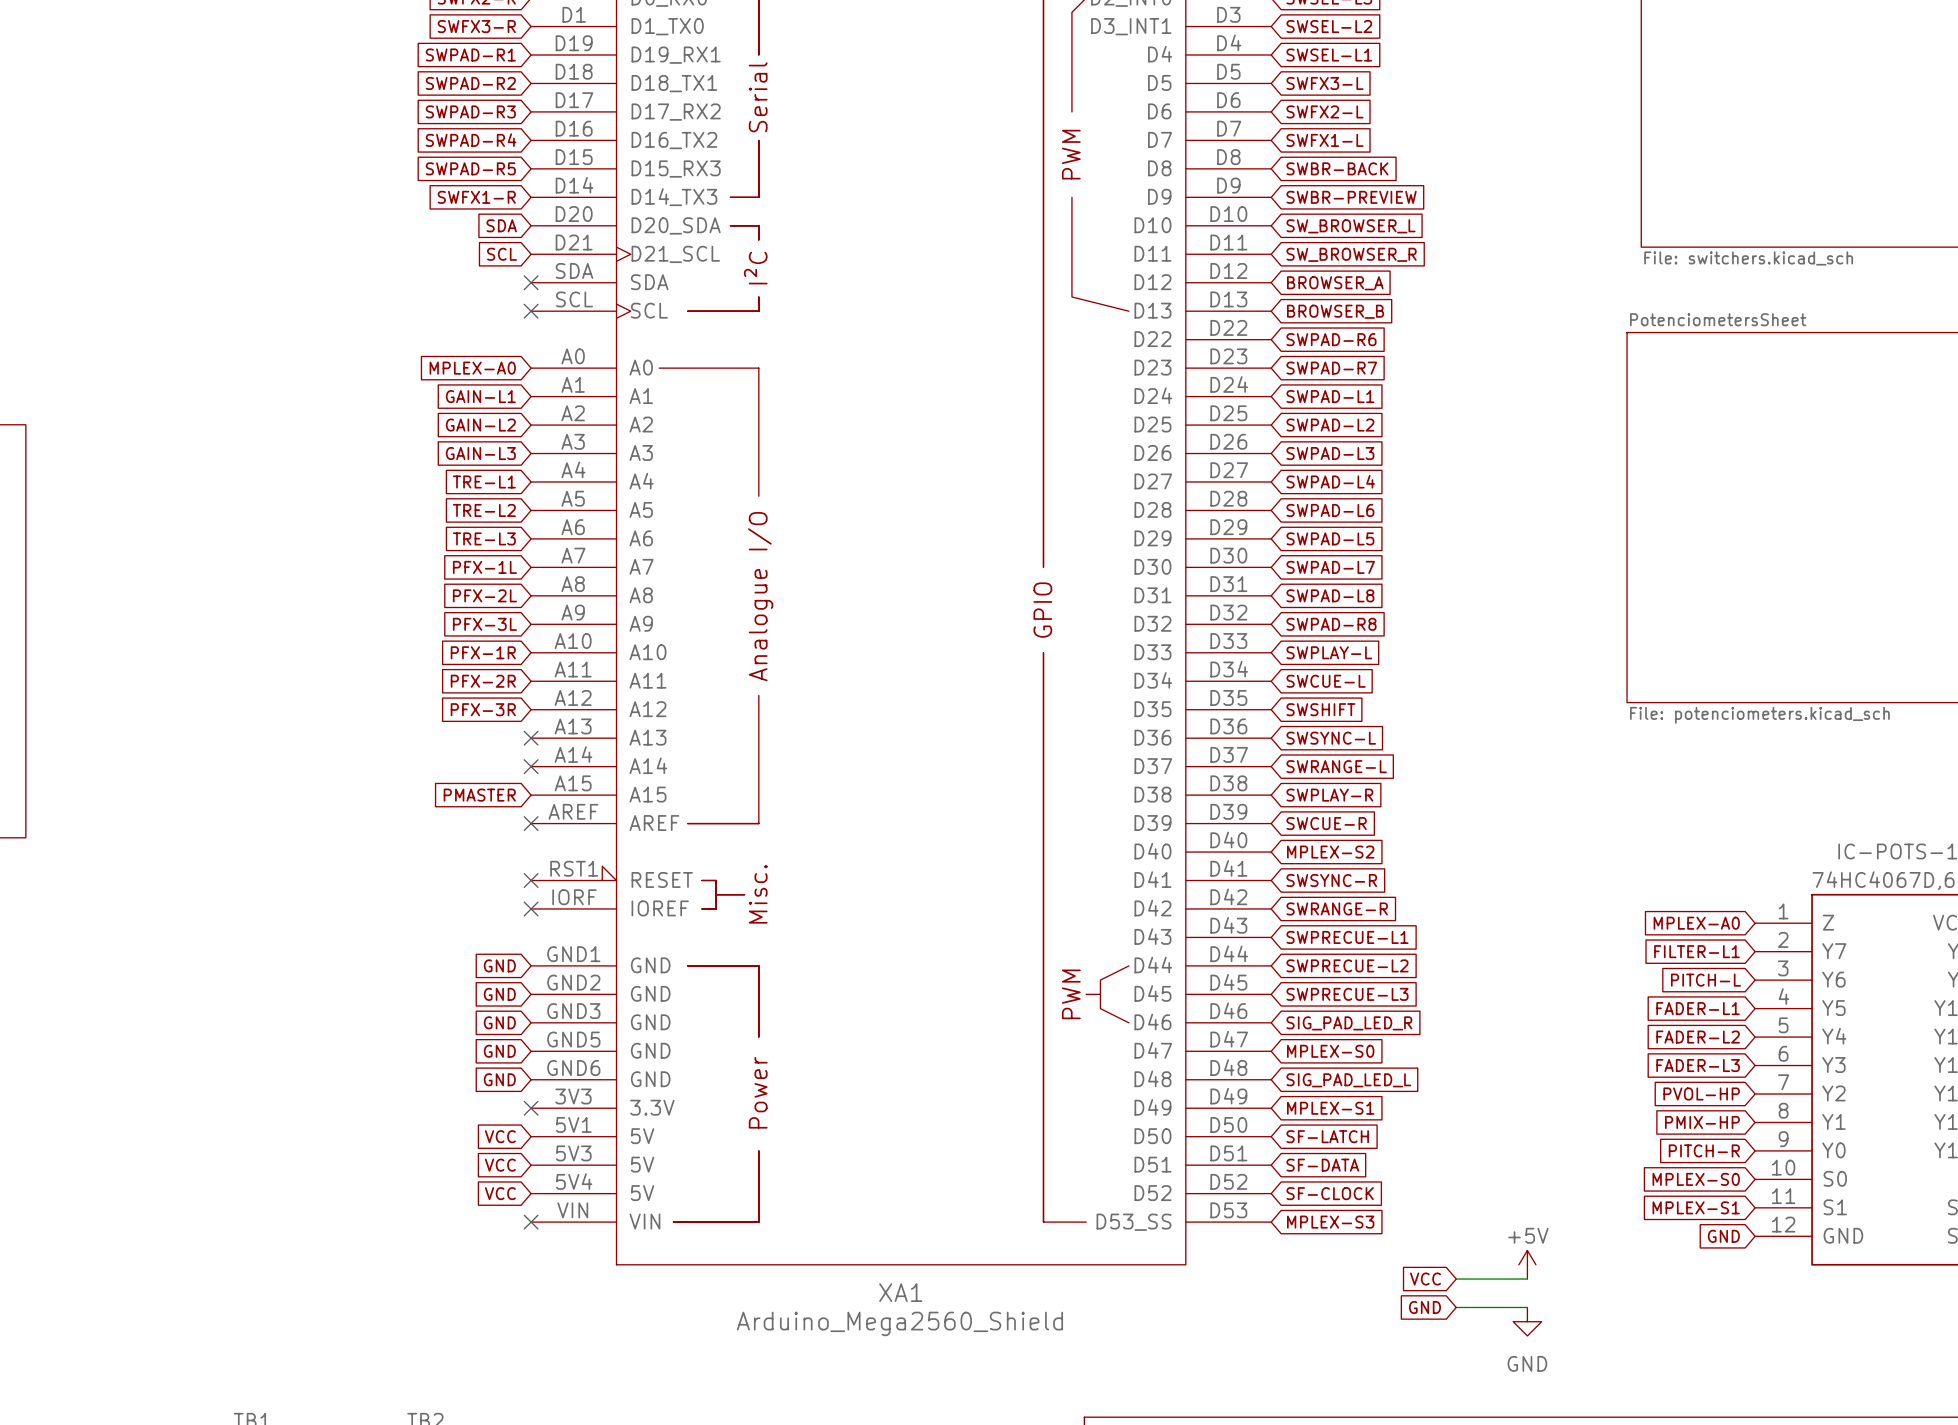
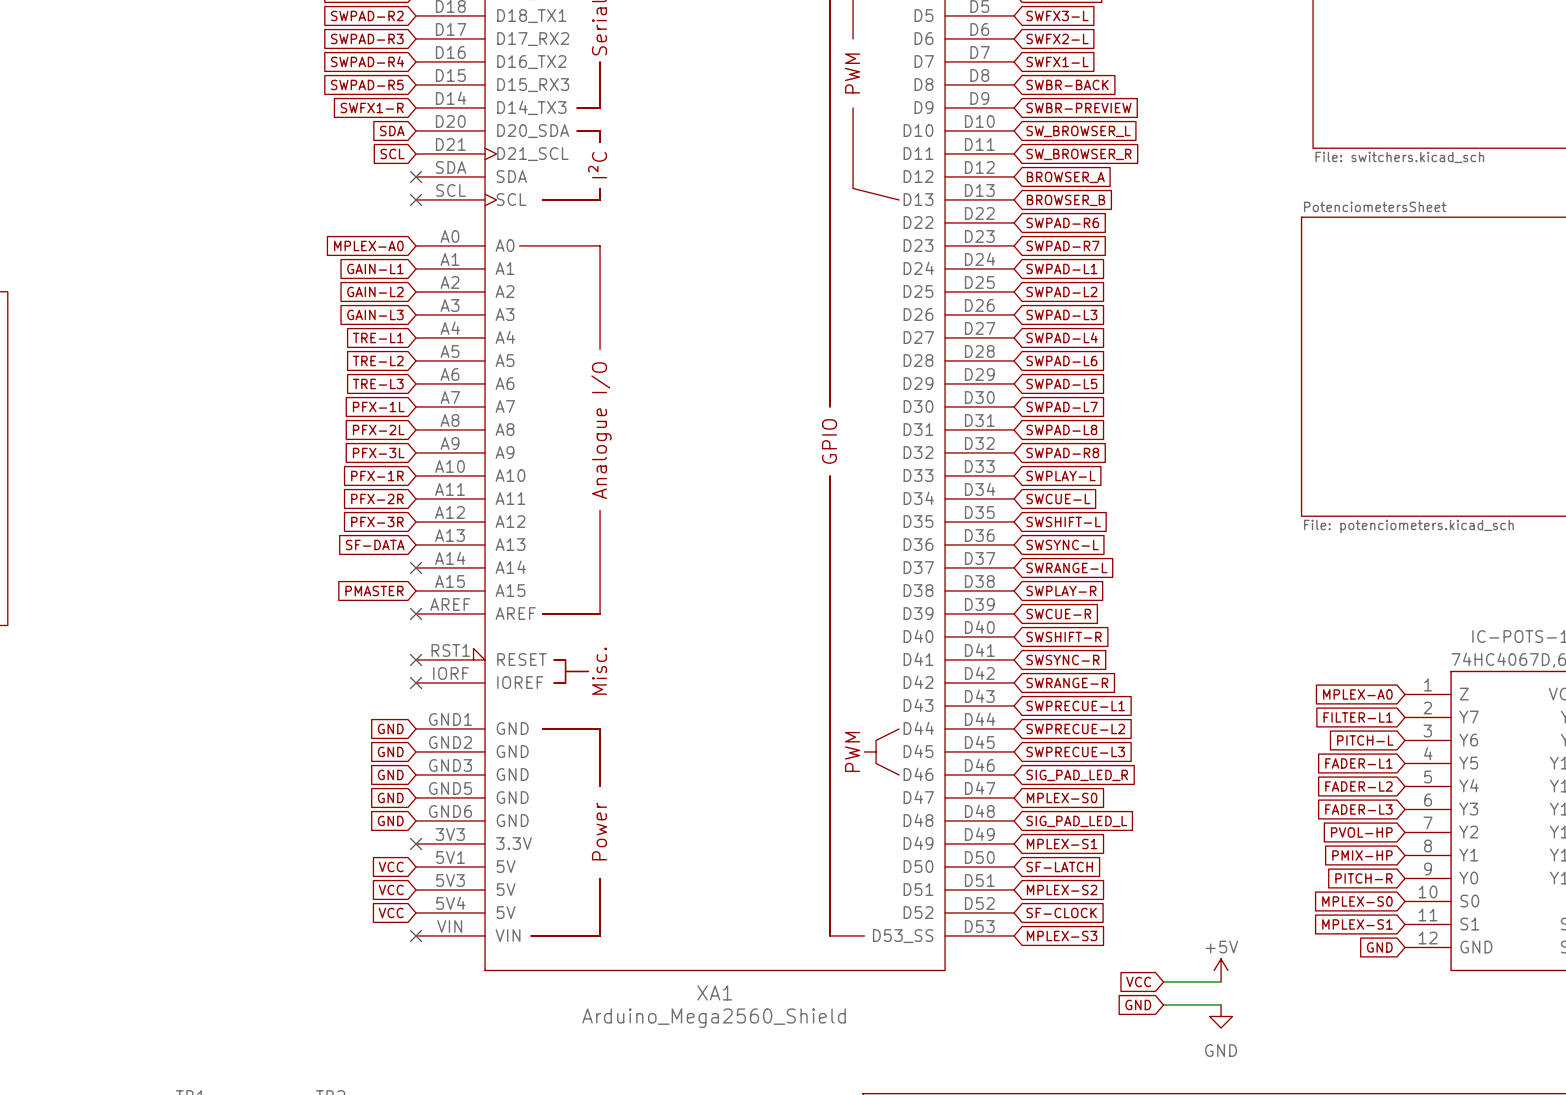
global label: SWSHIFT (1320, 709) -> SWSHIFT-L (1063, 521)
global label: none -> SF-DATA (375, 544)
no-connect mark: (531, 738) -> none
global label: MPLEX-S2 (1330, 852) -> SWSHIFT-R (1064, 636)
global label: SF-DATA (1322, 1165) -> MPLEX-S2 (1062, 889)

